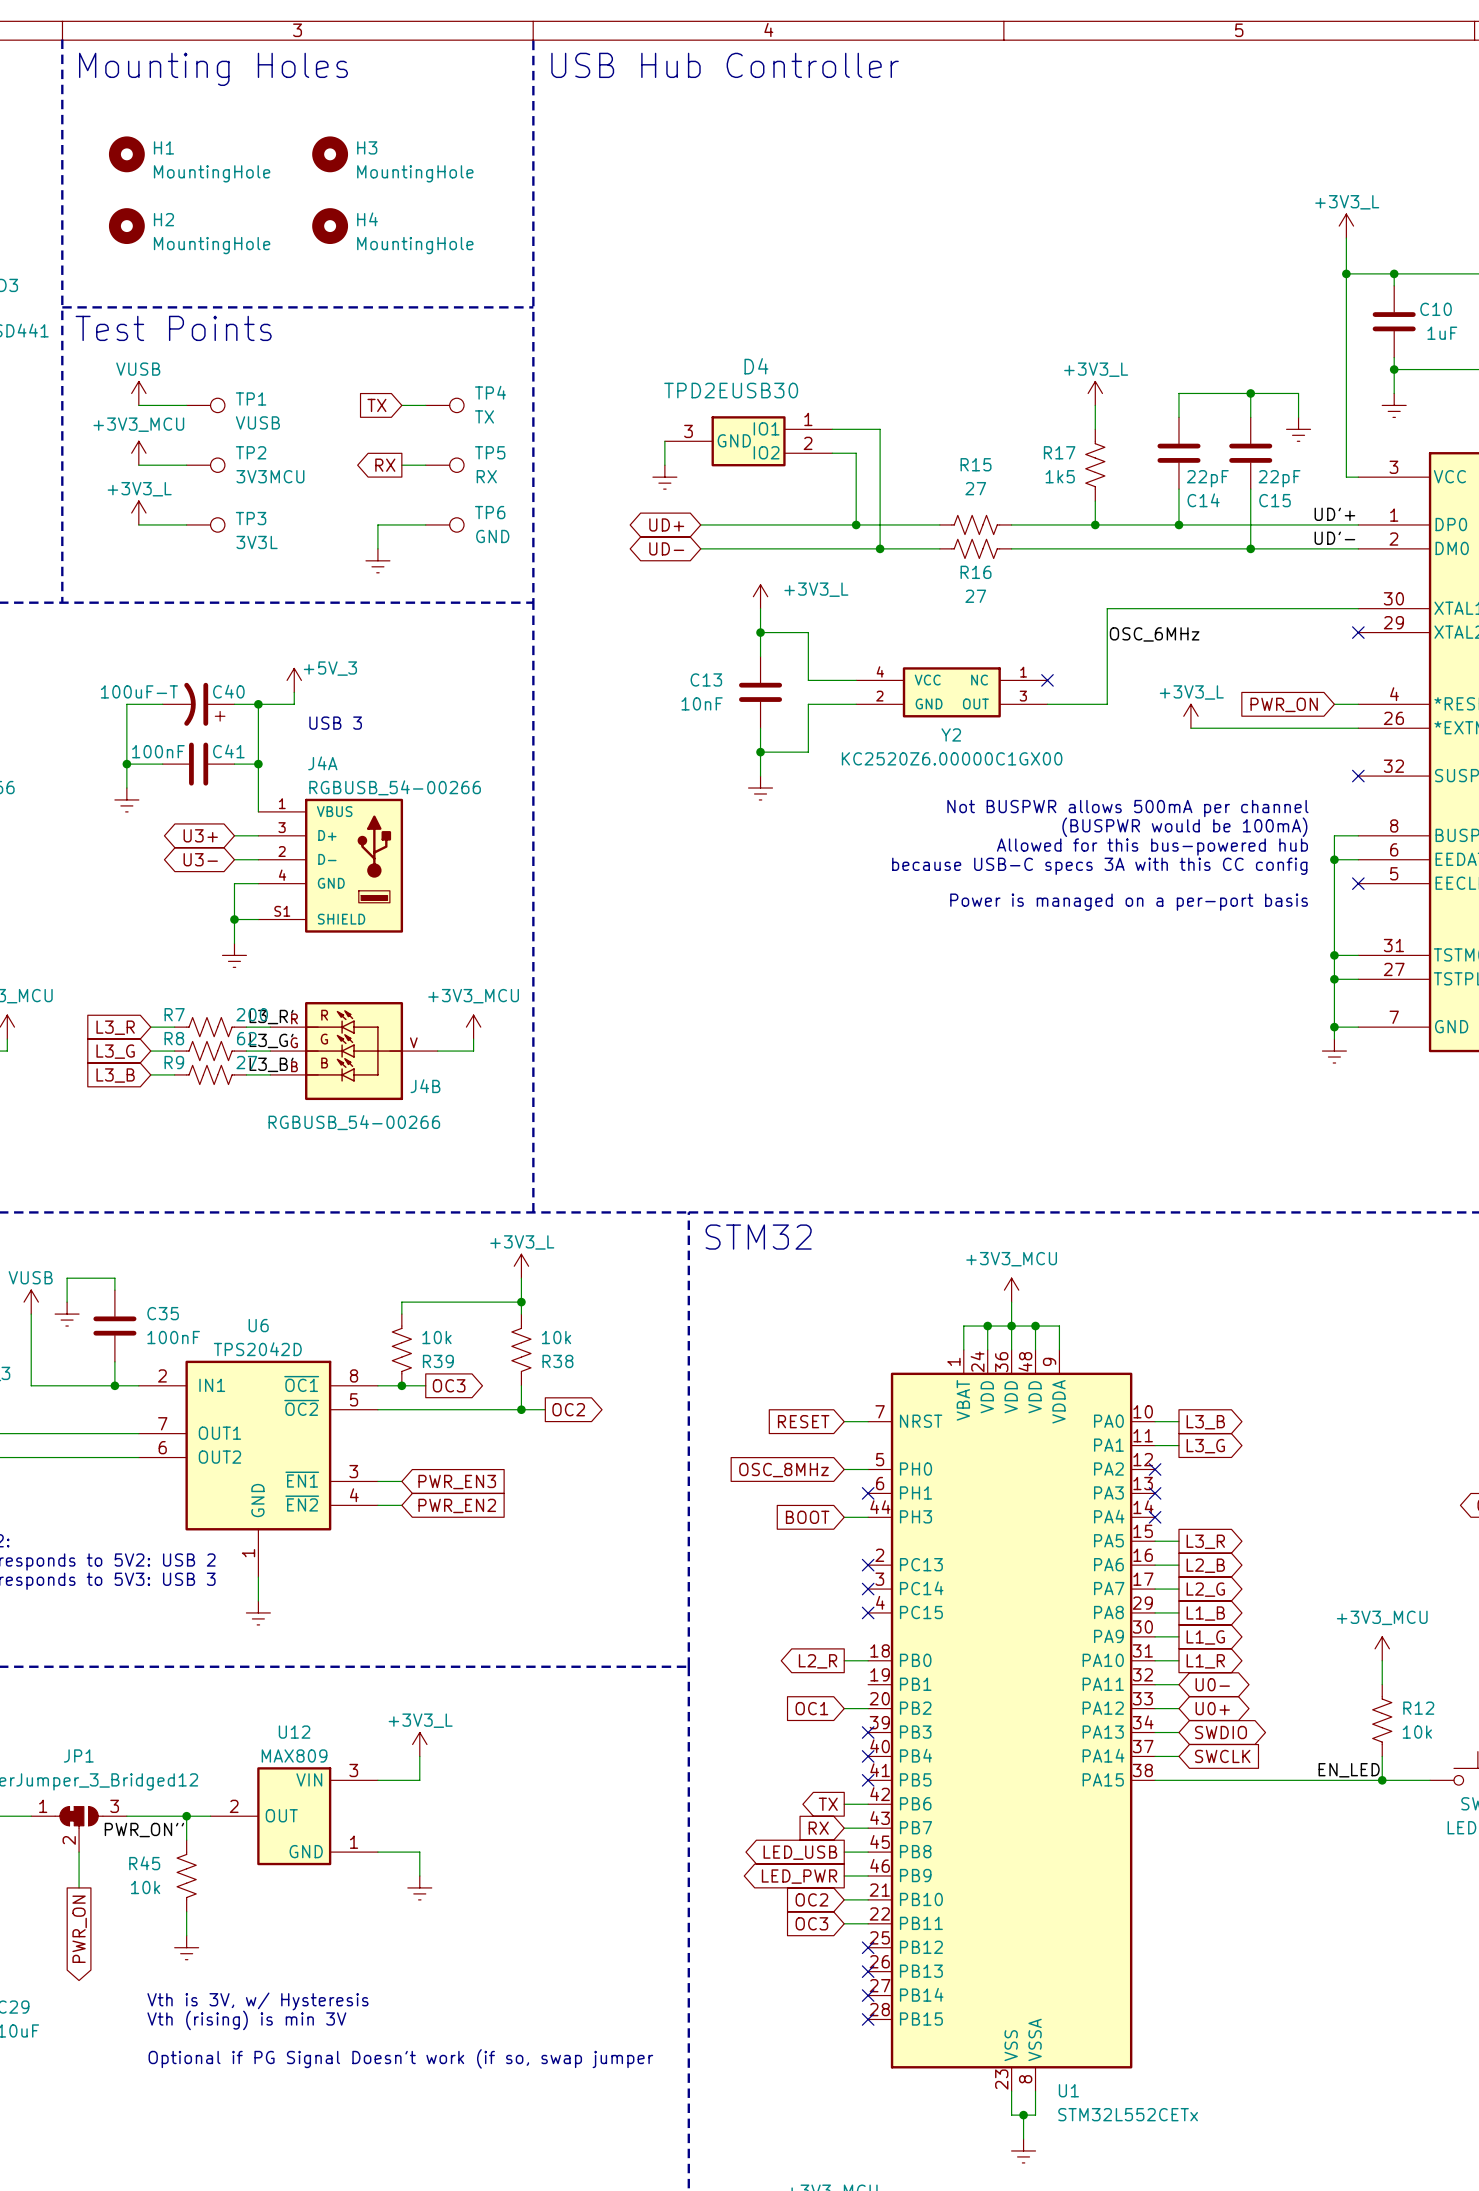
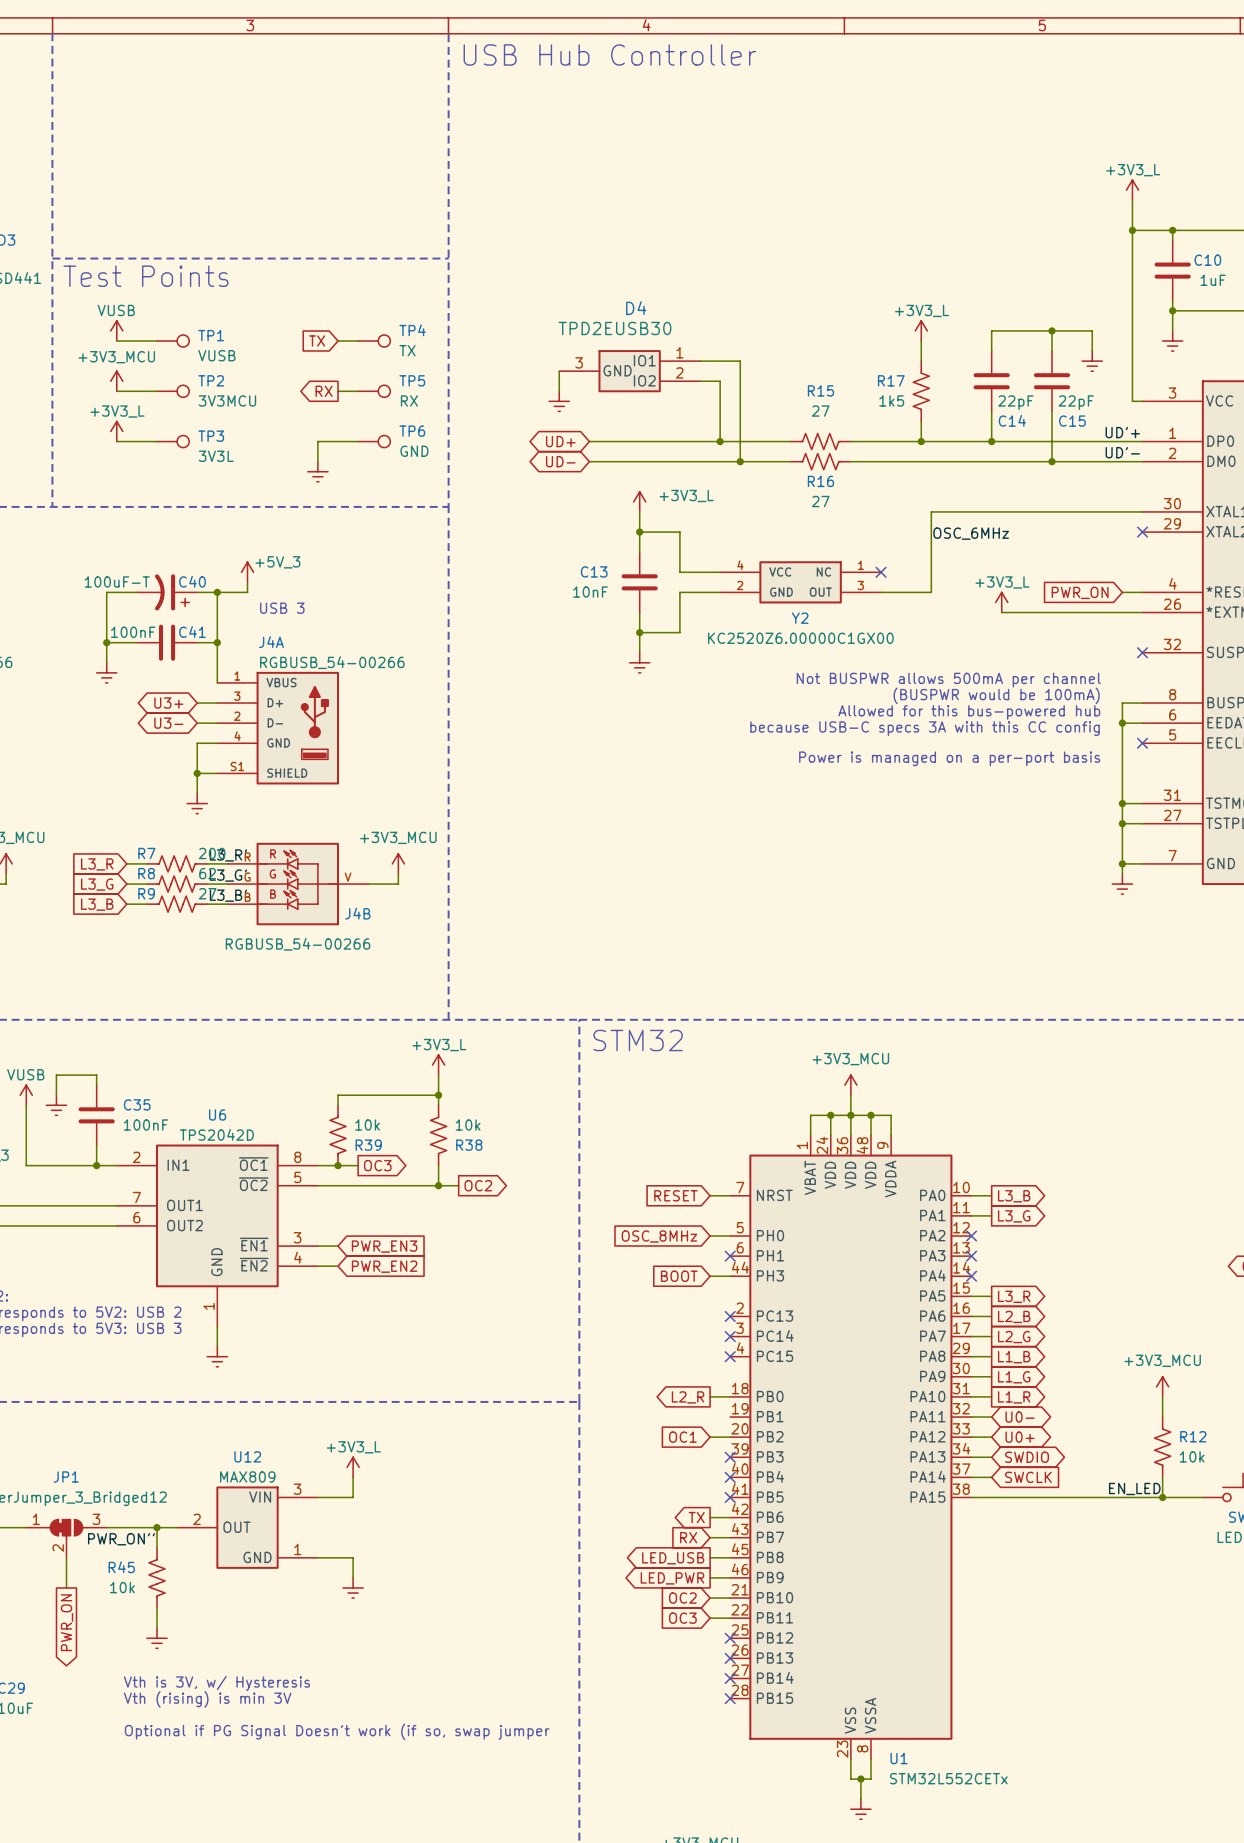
text: Mounting Holes (213, 69) -> none
H1: MountingHole (126, 154) -> none
H3: MountingHole (330, 154) -> none
H2: MountingHole (126, 226) -> none
H4: MountingHole (330, 226) -> none

